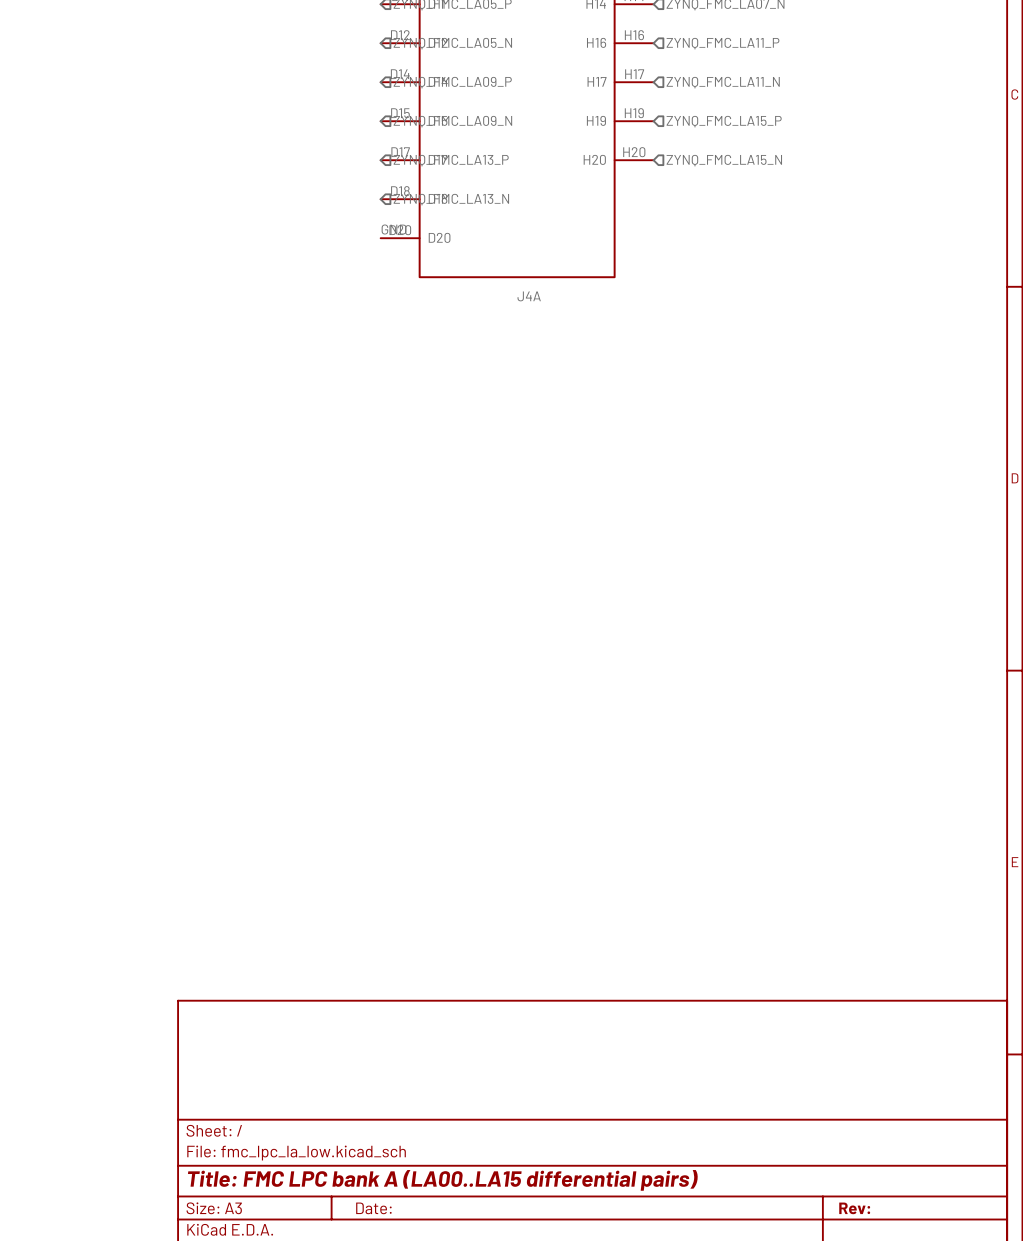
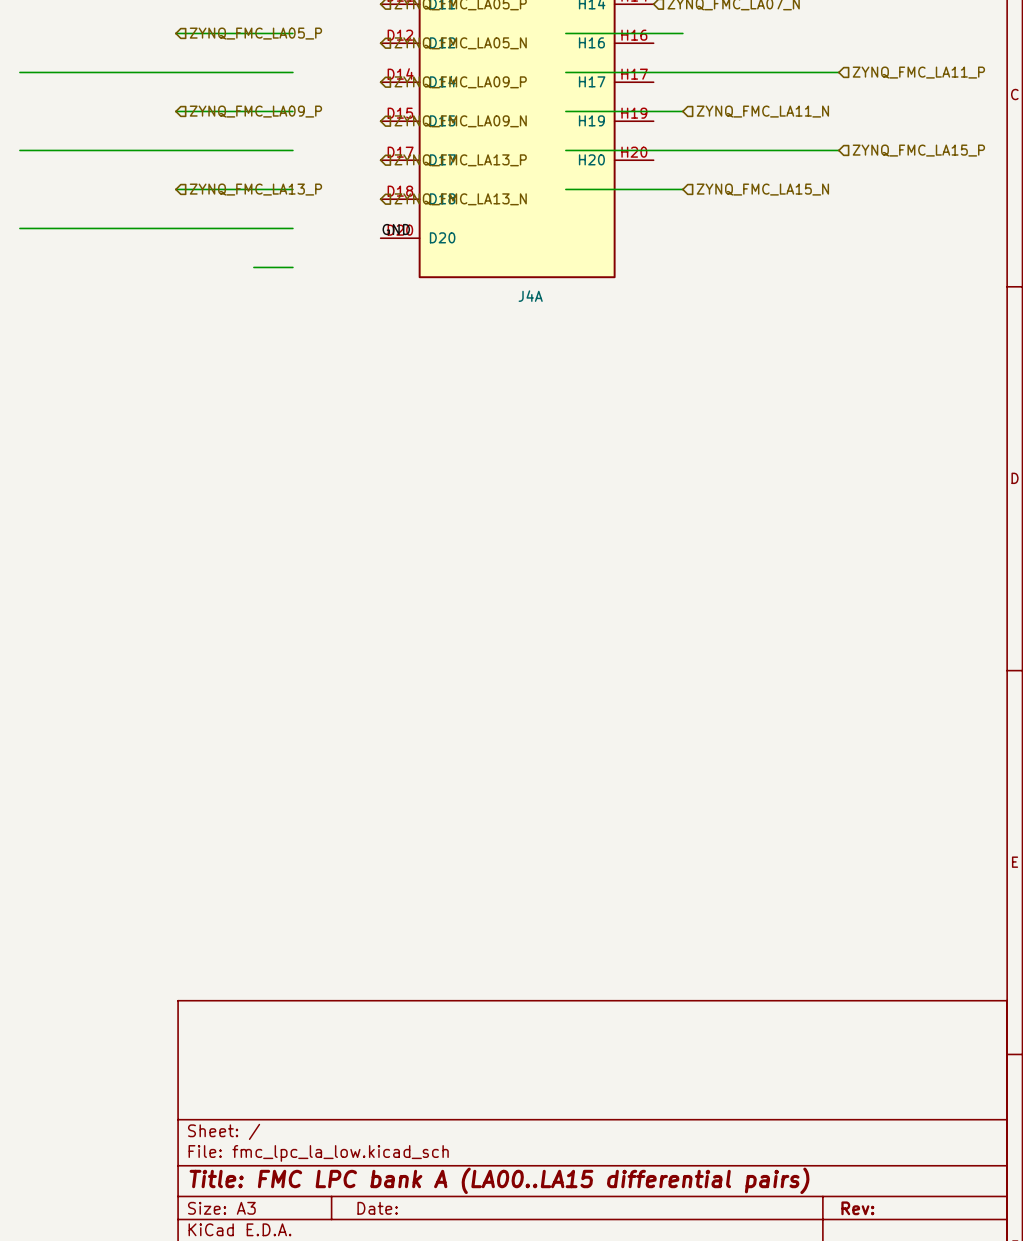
wire: none -> (175, 33) (292, 33)
hierarchical label: none -> ZYNQ_FMC_LA05_P (255, 33)
wire: none -> (565, 33) (682, 33)
hierarchical label position: ZYNQ_FMC_LA11_P (723, 43) -> ZYNQ_FMC_LA11_P (918, 72)
wire: none -> (19, 72) (292, 72)
wire: none -> (565, 72) (838, 72)
hierarchical label position: ZYNQ_FMC_LA11_N (723, 82) -> ZYNQ_FMC_LA11_N (762, 111)
wire: none -> (175, 111) (292, 111)
hierarchical label: none -> ZYNQ_FMC_LA09_P (255, 111)
wire: none -> (565, 111) (682, 111)
hierarchical label position: ZYNQ_FMC_LA15_P (724, 121) -> ZYNQ_FMC_LA15_P (918, 150)
wire: none -> (19, 150) (292, 150)
wire: none -> (565, 150) (838, 150)
hierarchical label position: ZYNQ_FMC_LA15_N (724, 160) -> ZYNQ_FMC_LA15_N (762, 189)
wire: none -> (175, 189) (292, 189)
hierarchical label: none -> ZYNQ_FMC_LA13_P (255, 189)
wire: none -> (565, 189) (682, 189)
wire: none -> (19, 228) (292, 228)
wire: none -> (253, 267) (292, 267)

